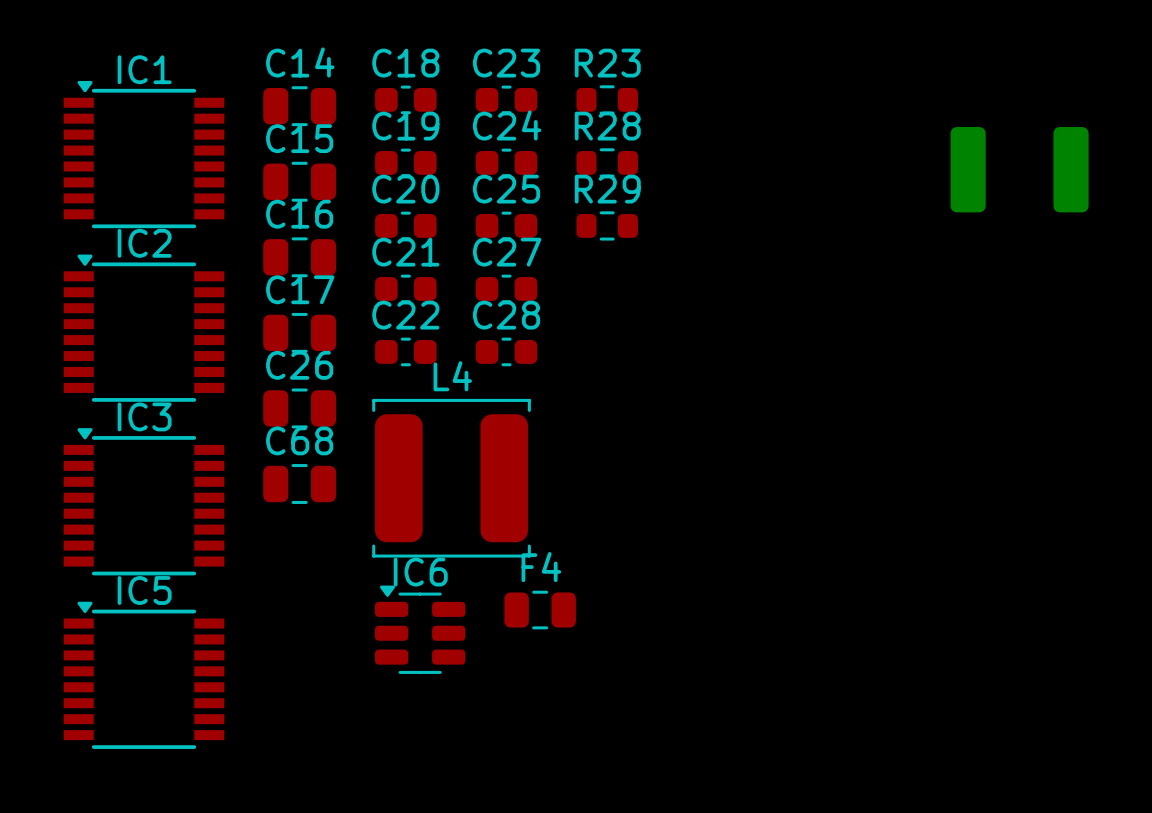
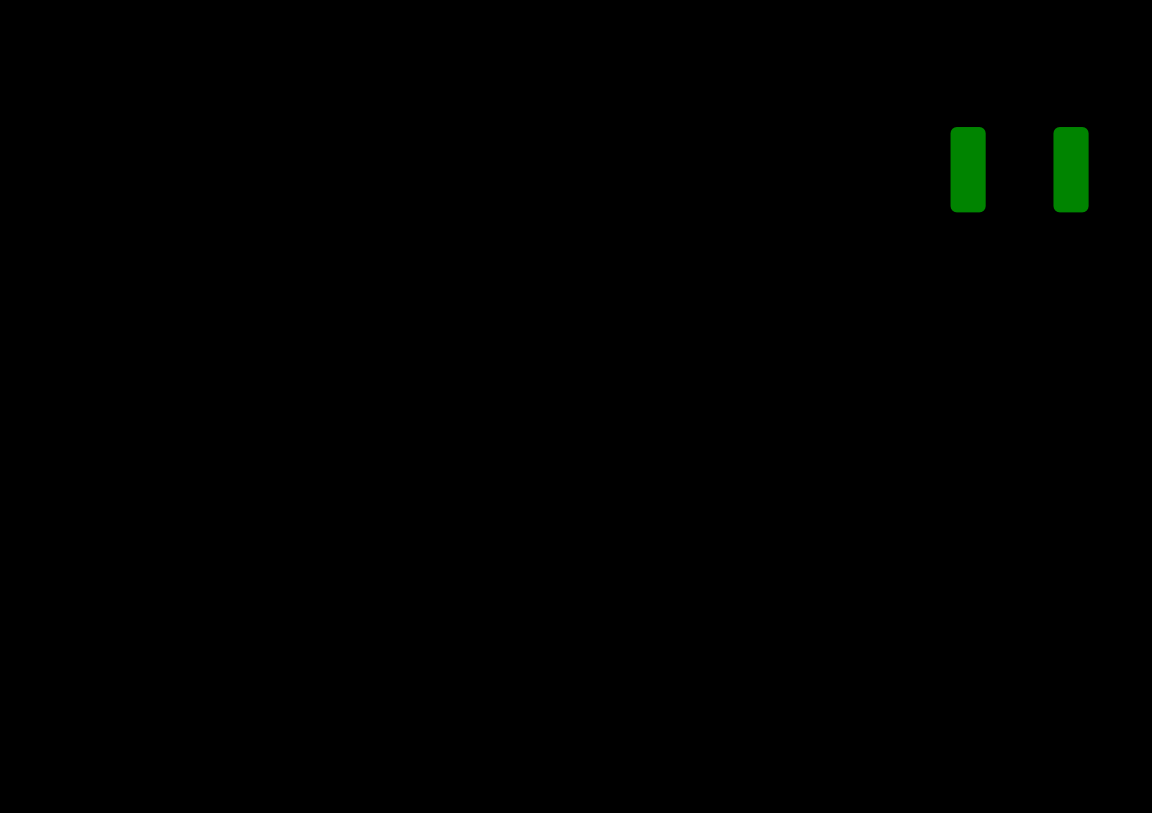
C18: (405, 99) -> none
C23: (506, 99) -> none
R23: (607, 99) -> none
C14: (299, 106) -> none
IC1: (144, 154) -> none
C19: (405, 162) -> none
C24: (506, 162) -> none
R28: (607, 162) -> none
C15: (299, 181) -> none
C20: (405, 225) -> none
C25: (506, 225) -> none
R29: (607, 225) -> none
C16: (299, 257) -> none
C21: (405, 288) -> none
C27: (506, 288) -> none
IC2: (144, 328) -> none
C17: (299, 332) -> none
C22: (405, 351) -> none
C28: (506, 351) -> none
C26: (299, 408) -> none
L4: (451, 478) -> none
C68: (299, 484) -> none
IC3: (144, 501) -> none
F4: (540, 610) -> none
IC6: (420, 629) -> none
IC5: (144, 675) -> none

